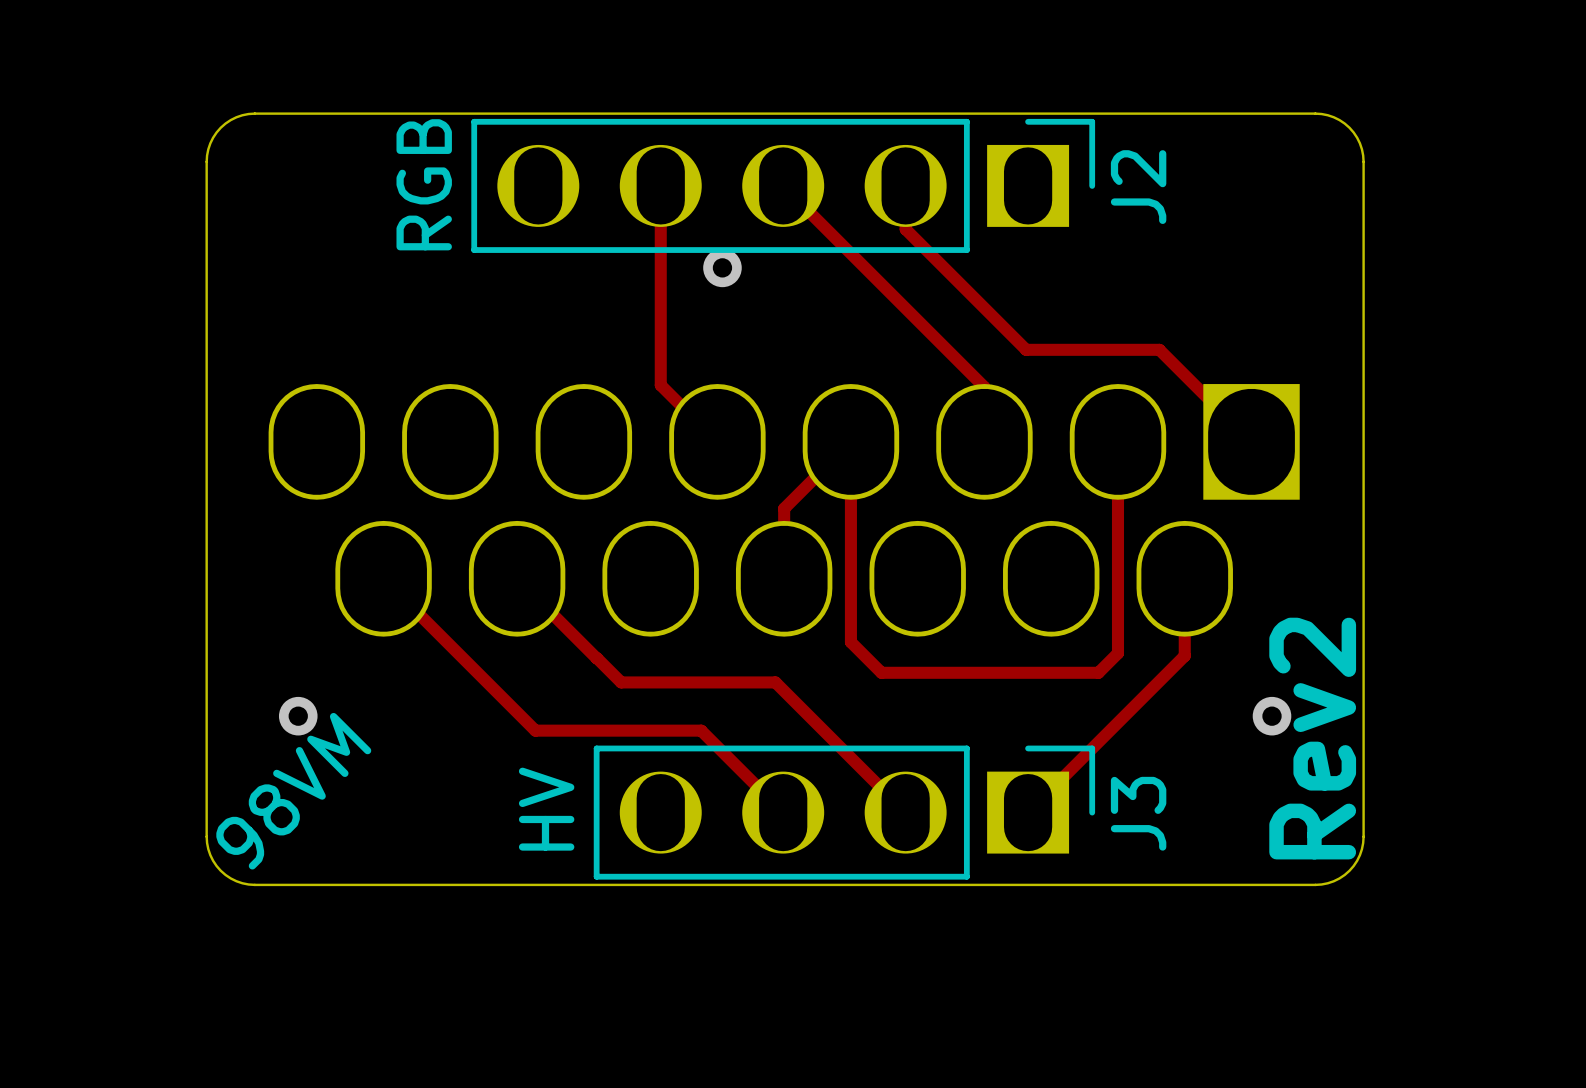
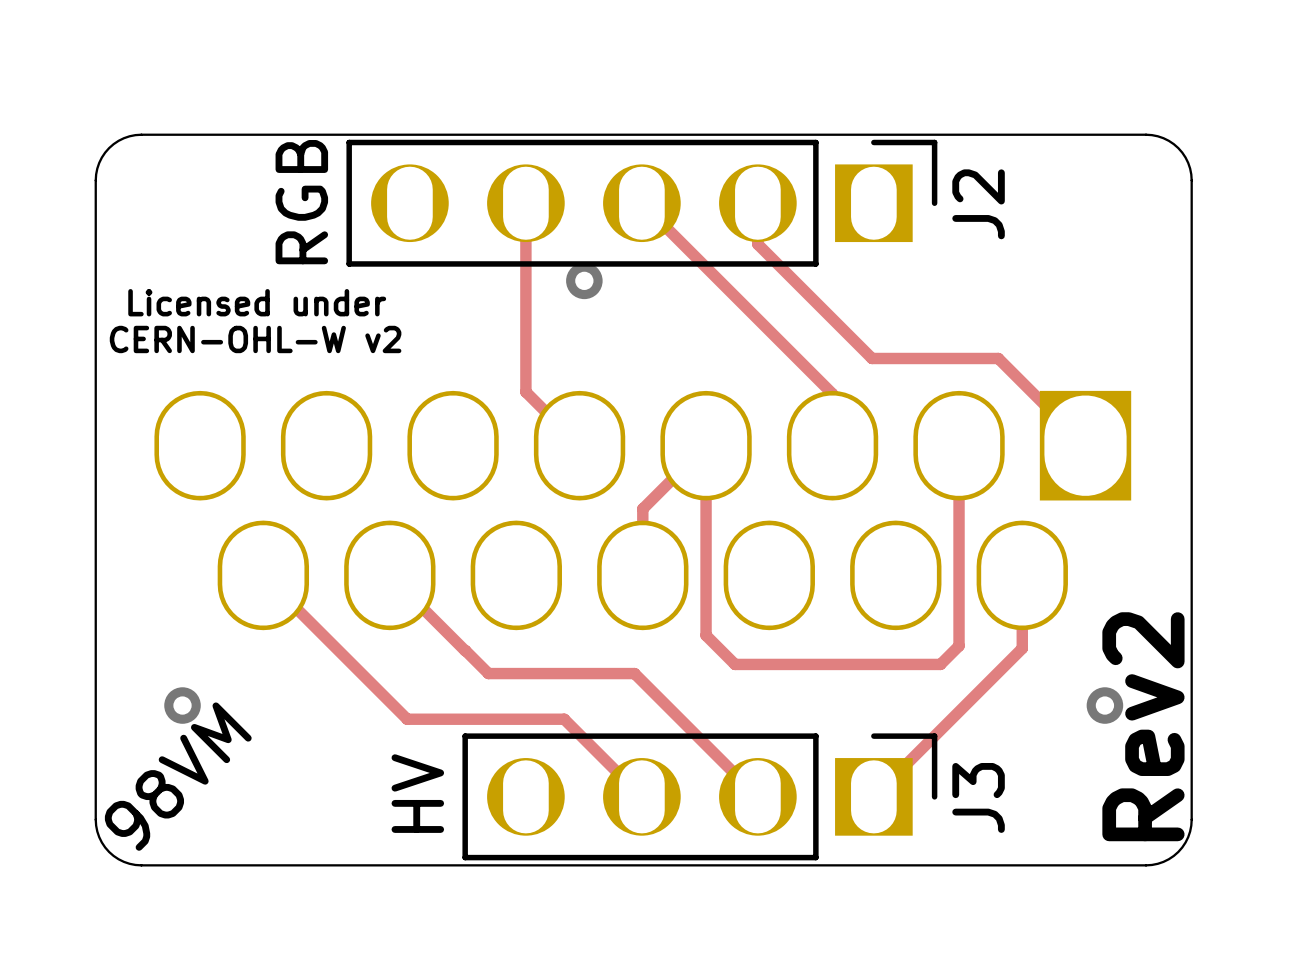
text: none -> Licensed under (257, 302)
text: none -> CERN-OHL-W v2 (255, 339)

